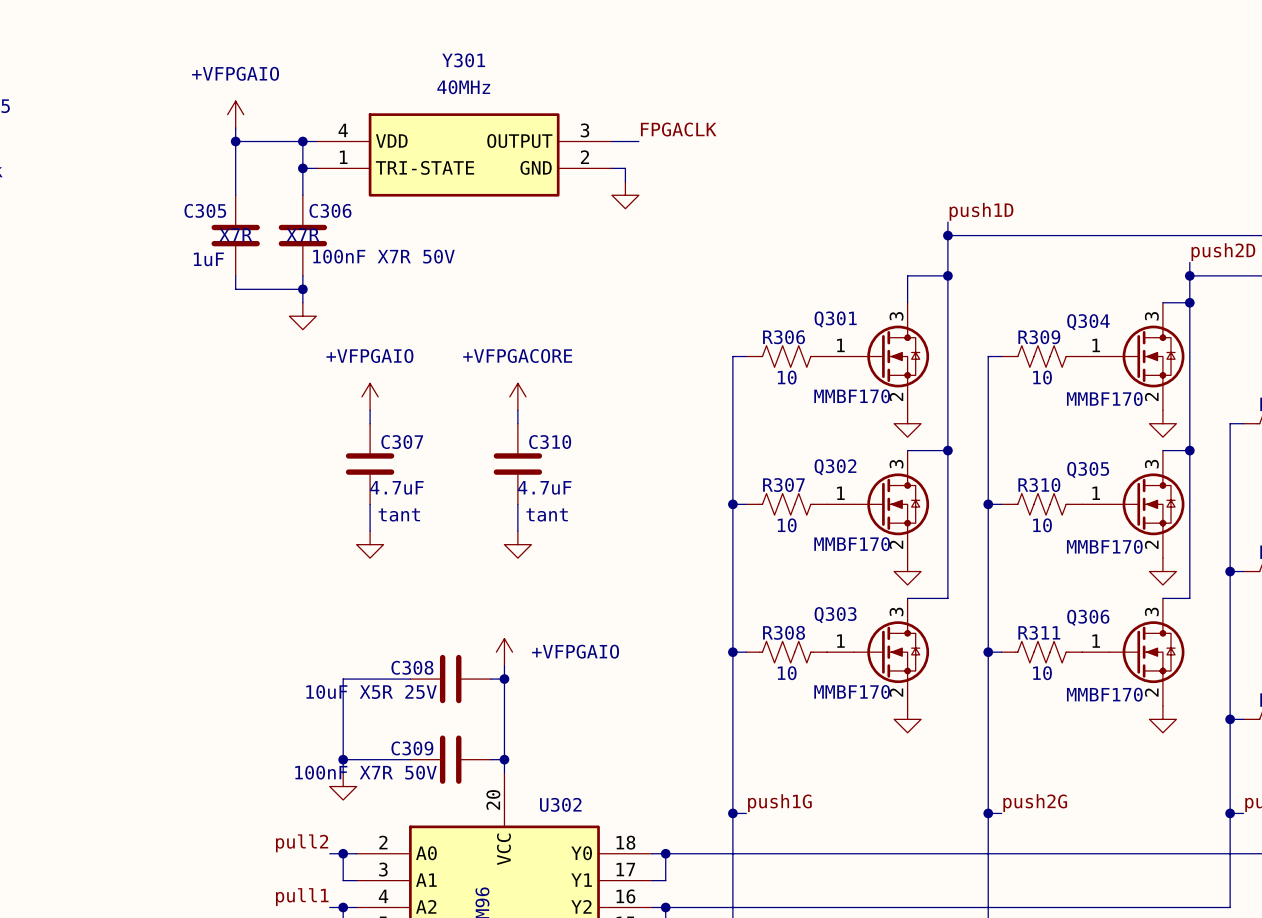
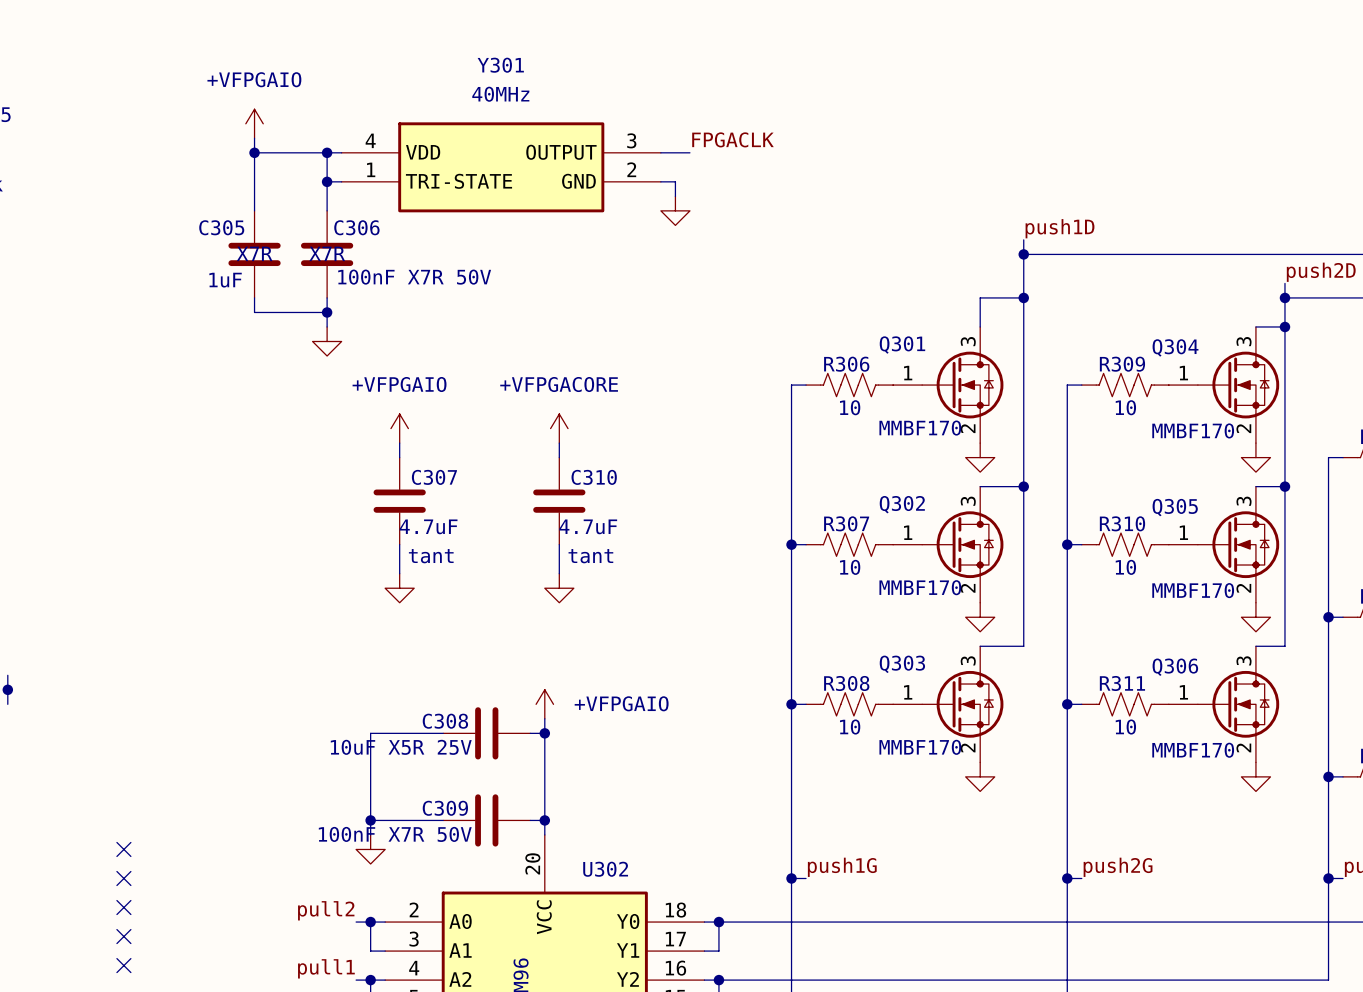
wire: none -> (7, 675) (7, 704)
junction: none -> (7, 689)
no-connect mark: none -> (123, 849)
no-connect mark: none -> (123, 878)
no-connect mark: none -> (123, 907)
no-connect mark: none -> (123, 936)
no-connect mark: none -> (123, 965)

